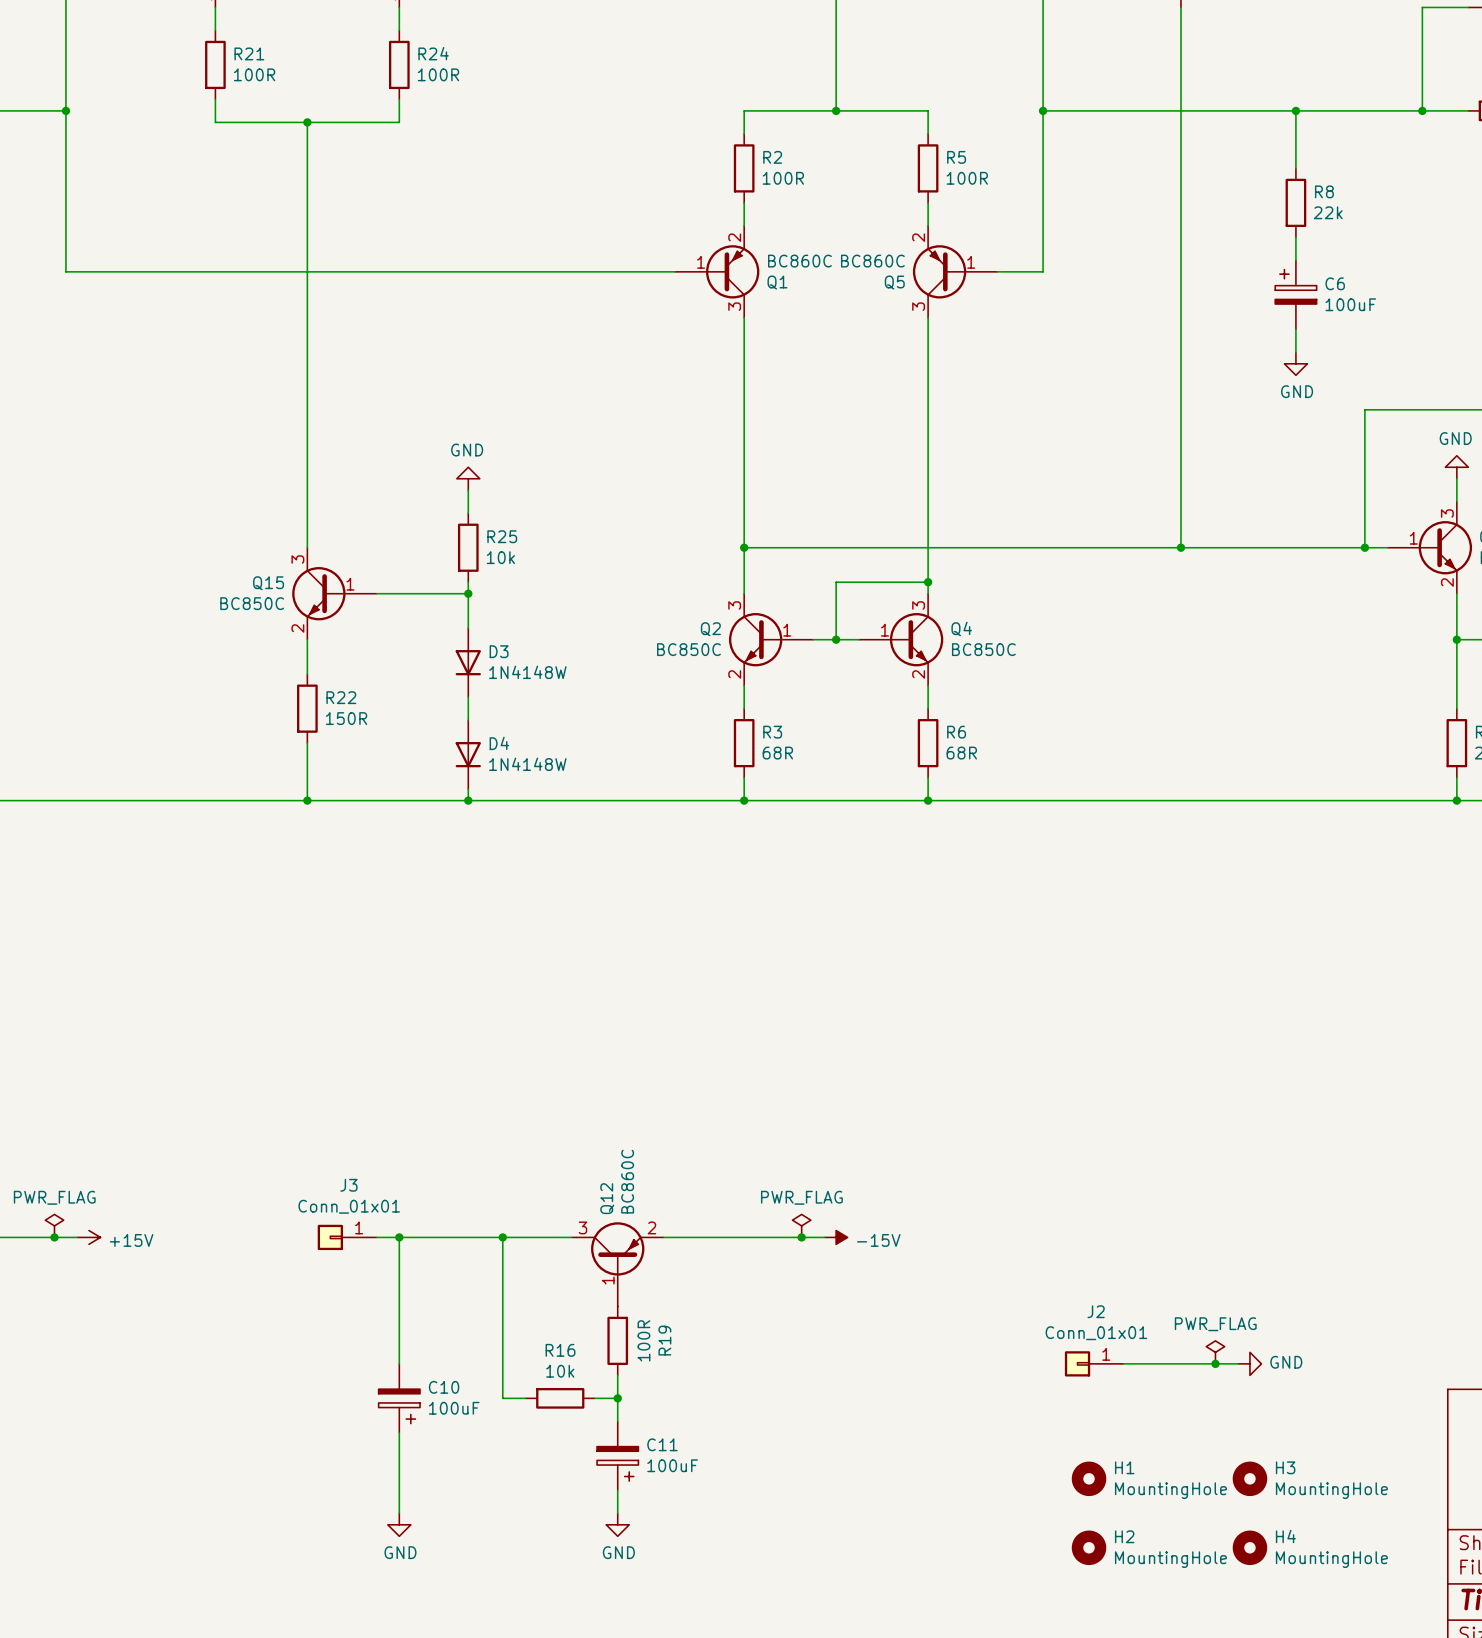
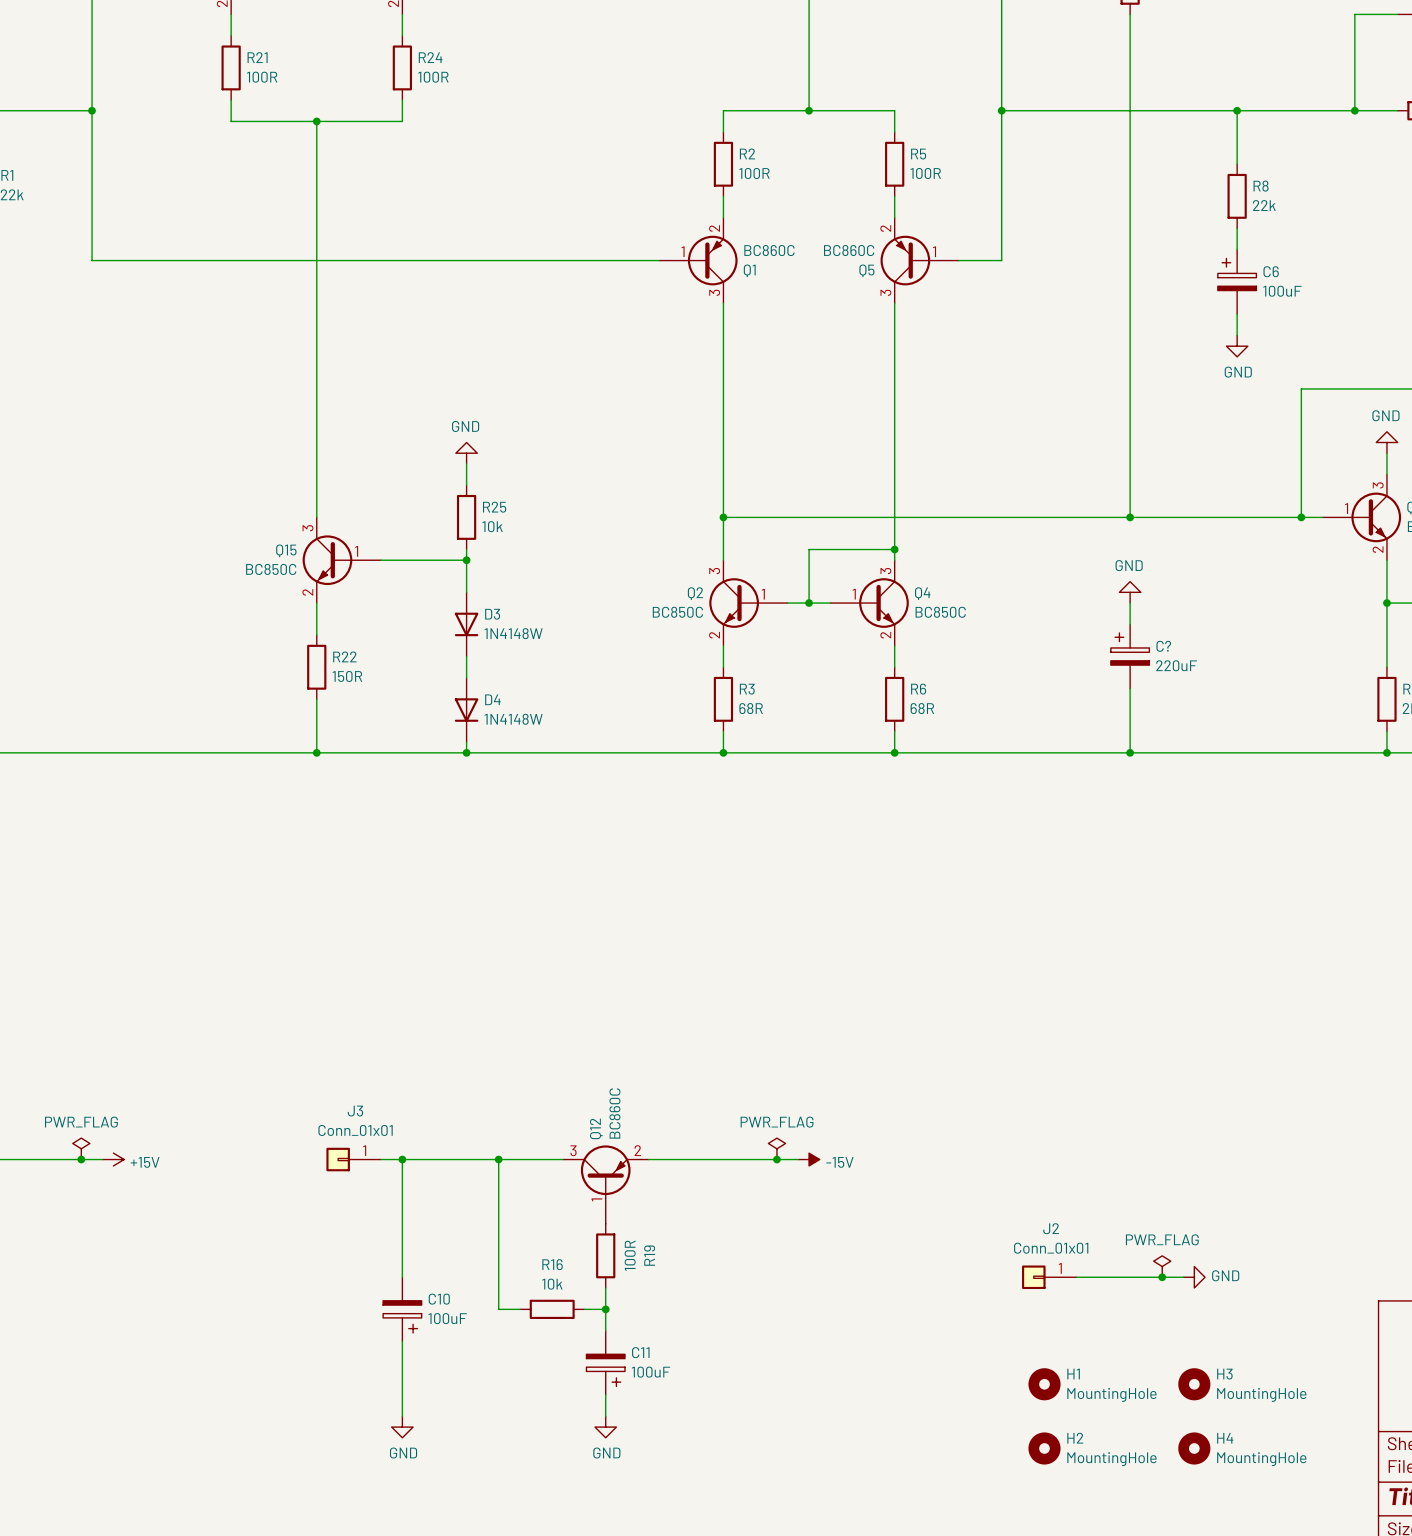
power symbol: none -> GND (1130, 592)
wire: none -> (1130, 603) (1130, 624)
C?: none -> 220uF (1130, 656)
wire: none -> (1130, 688) (1130, 752)
junction: none -> (1130, 752)

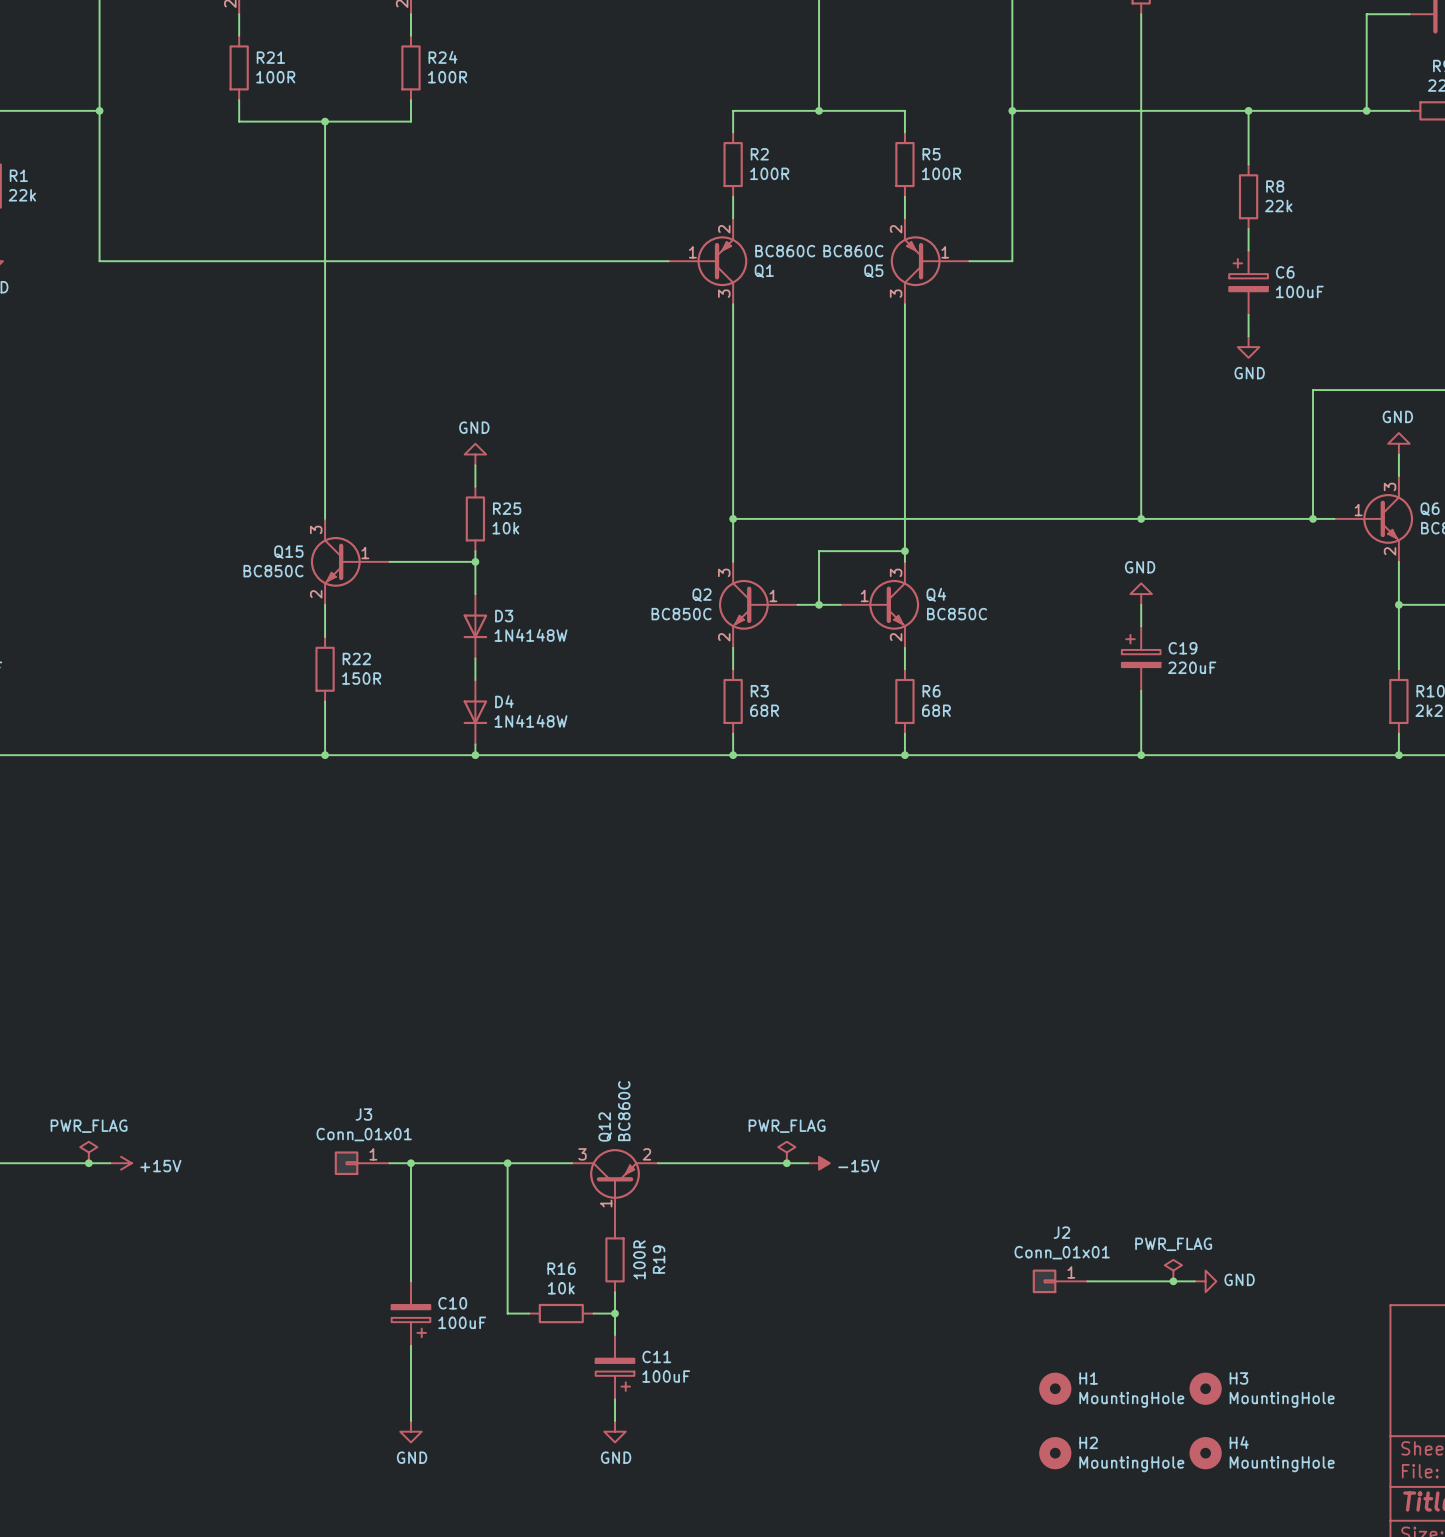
C? name: C? (1163, 646) -> C19 (1182, 648)

